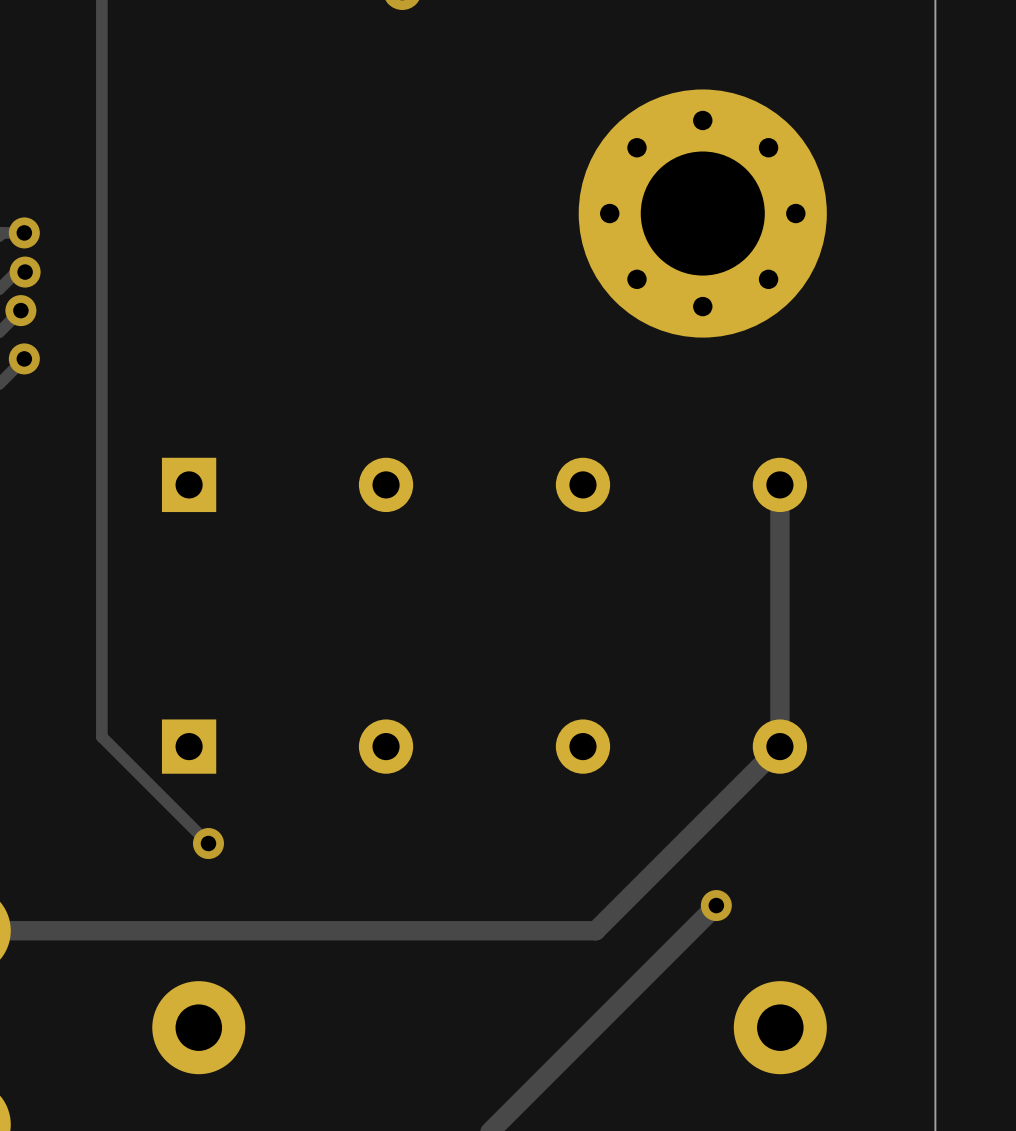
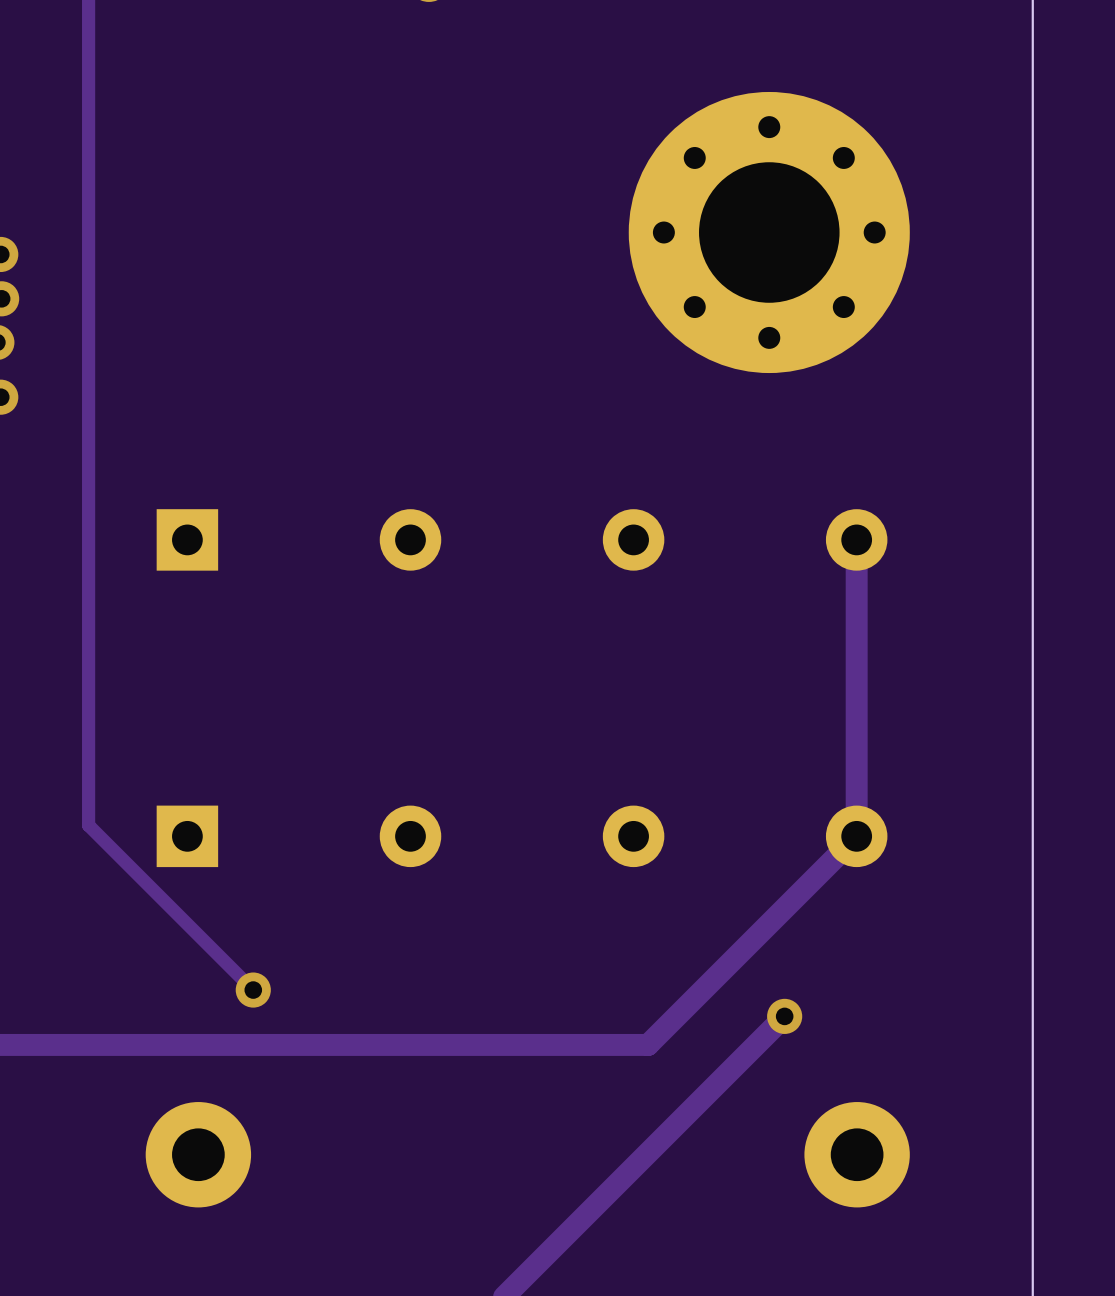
track: none -> (209, 946) (253, 990)
via position: (208, 843) -> (253, 990)

